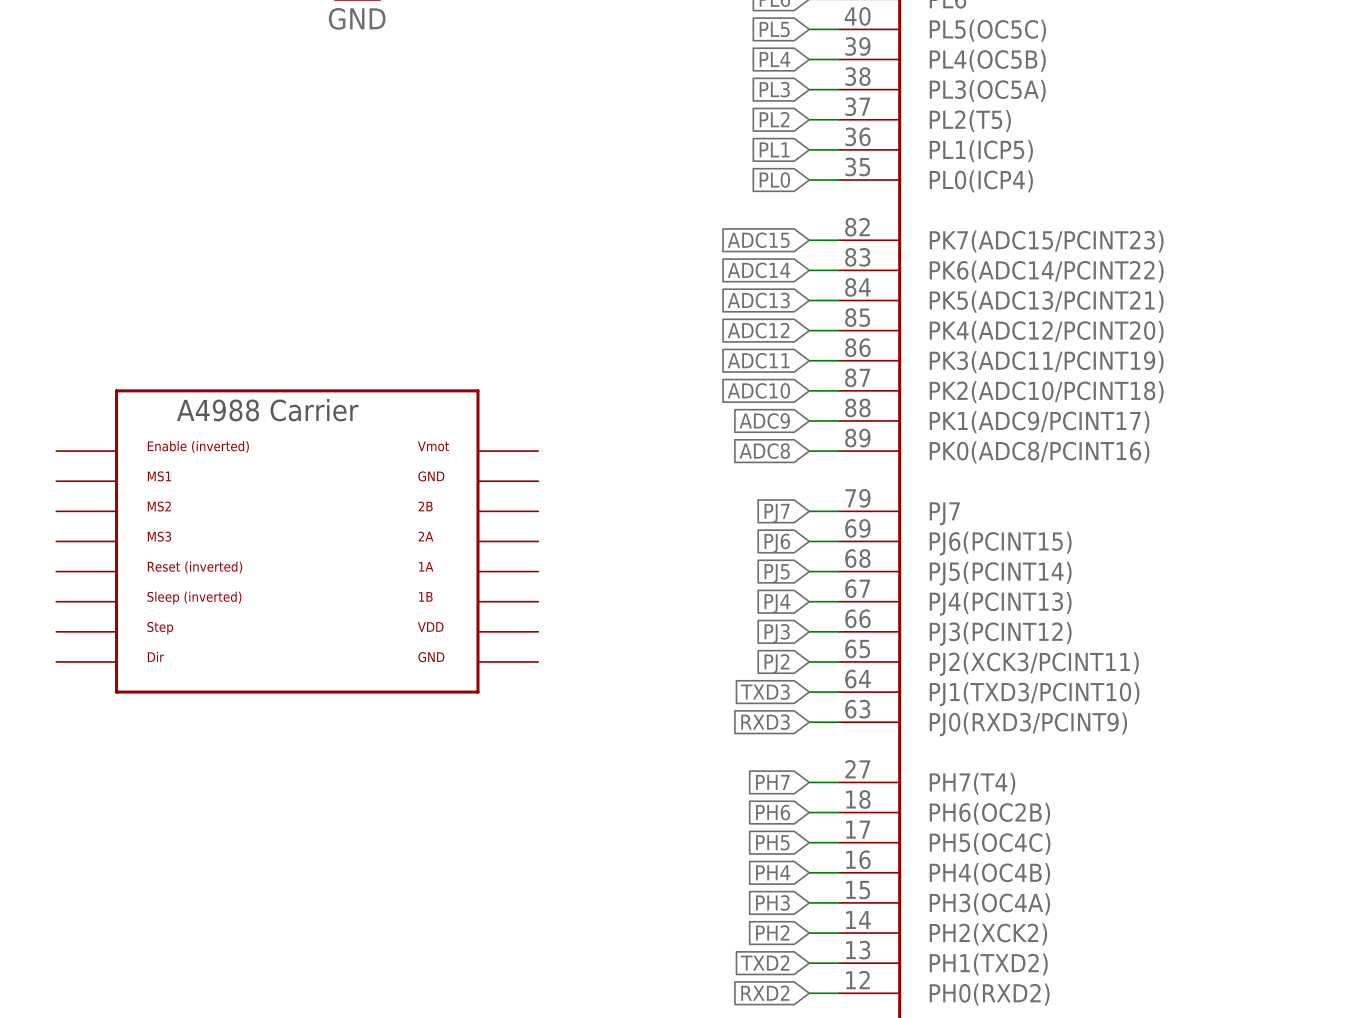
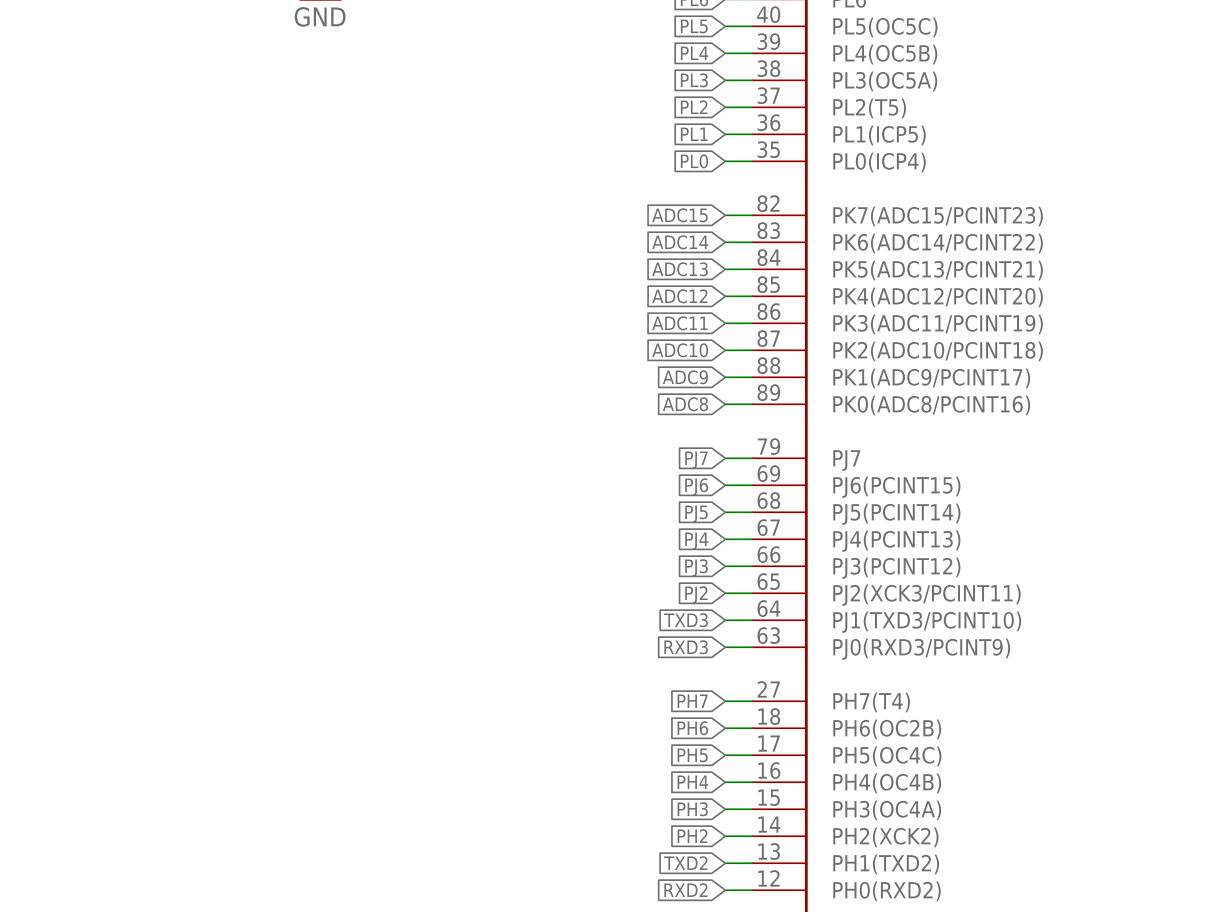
part: (297, 541) -> none

